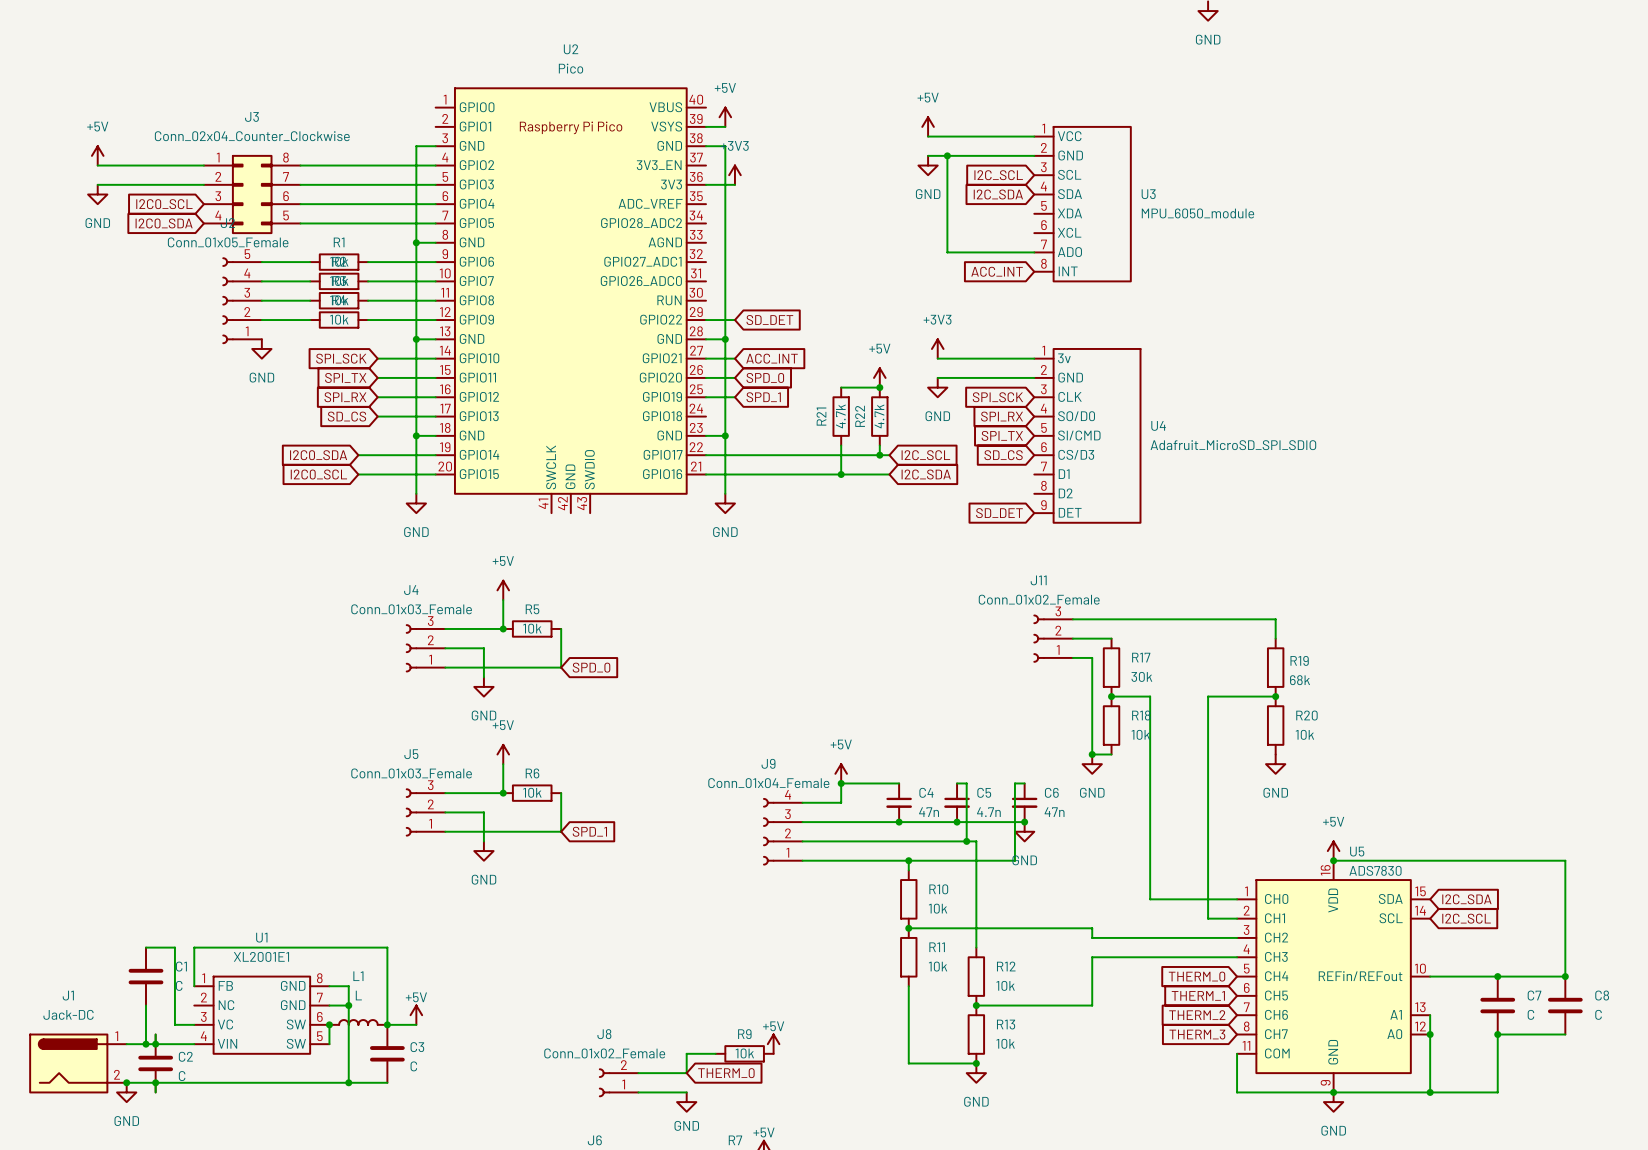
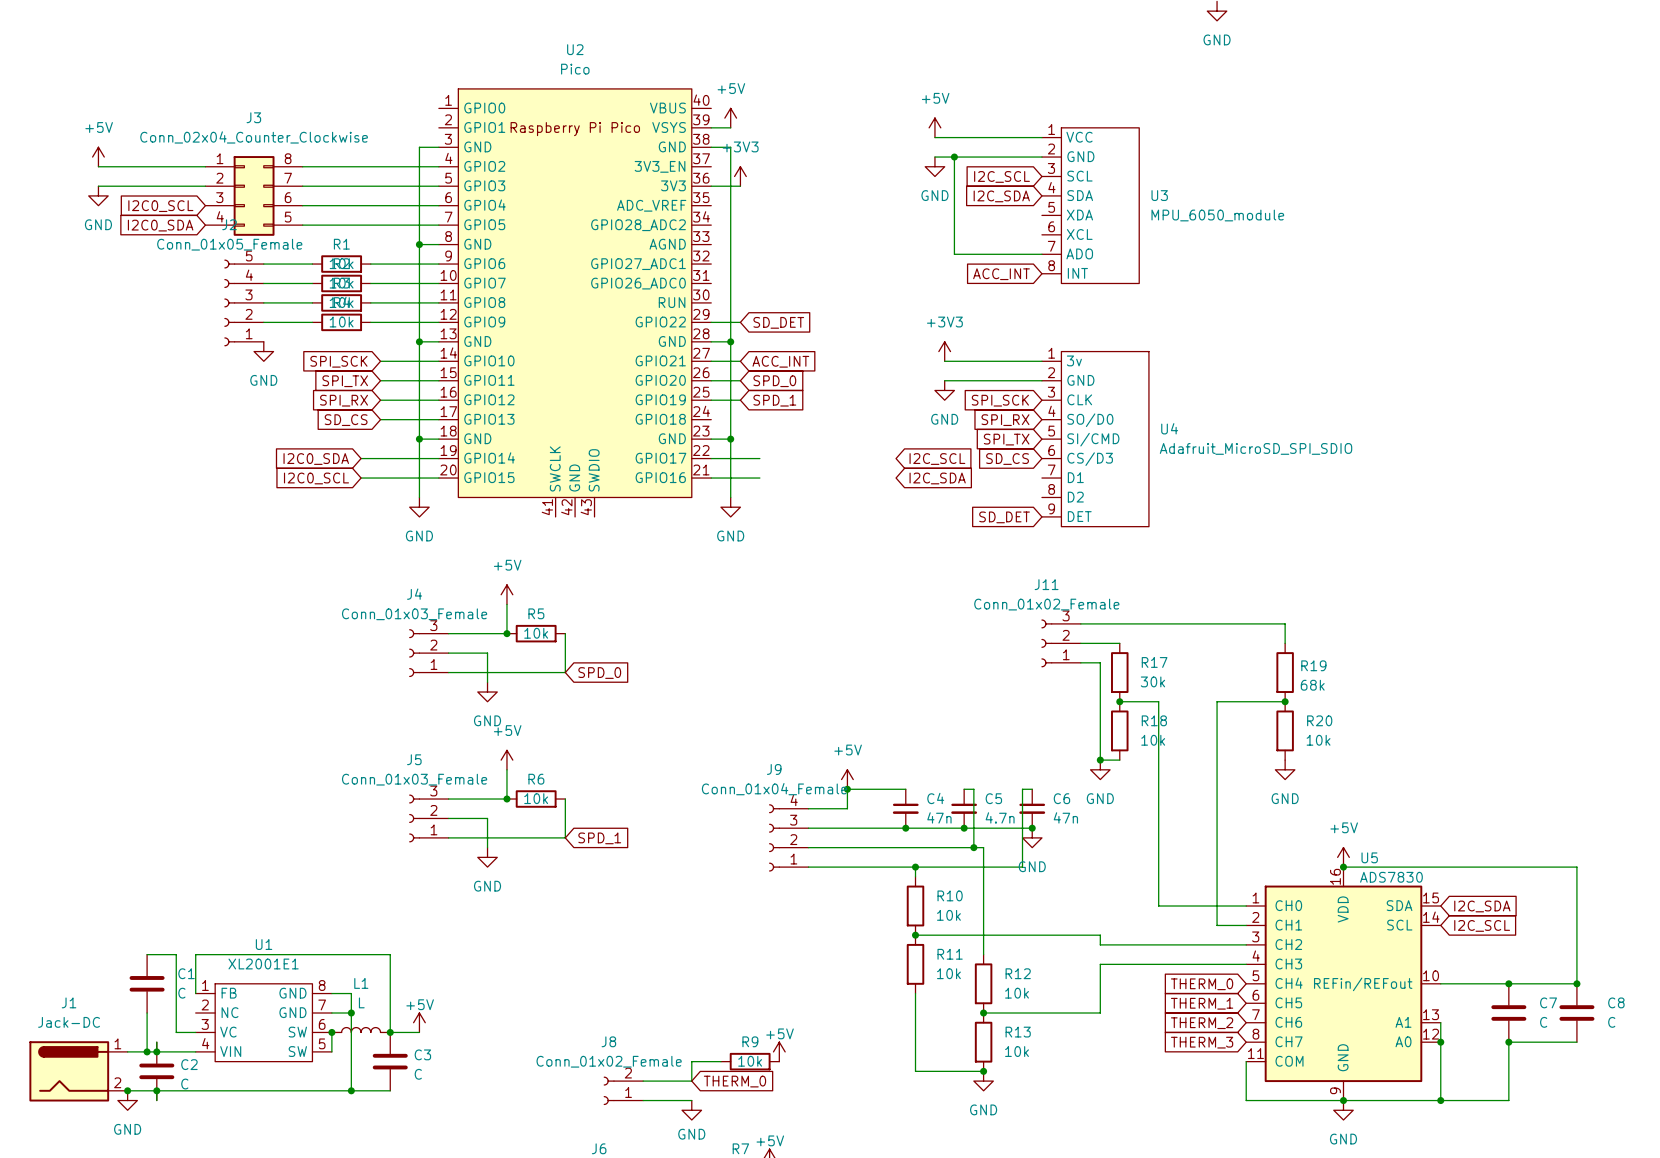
power symbol: +5V (879, 377) -> none
wire: (841, 387) (879, 387) -> none
junction: (879, 387) -> none
R21: 4.7k (841, 416) -> none
R22: 4.7k (879, 416) -> none
wire: (841, 445) (841, 474) -> none
wire: (879, 445) (879, 455) -> none
wire: (754, 455) (889, 455) -> none
junction: (879, 455) -> none
wire: (754, 474) (889, 474) -> none
junction: (841, 474) -> none

